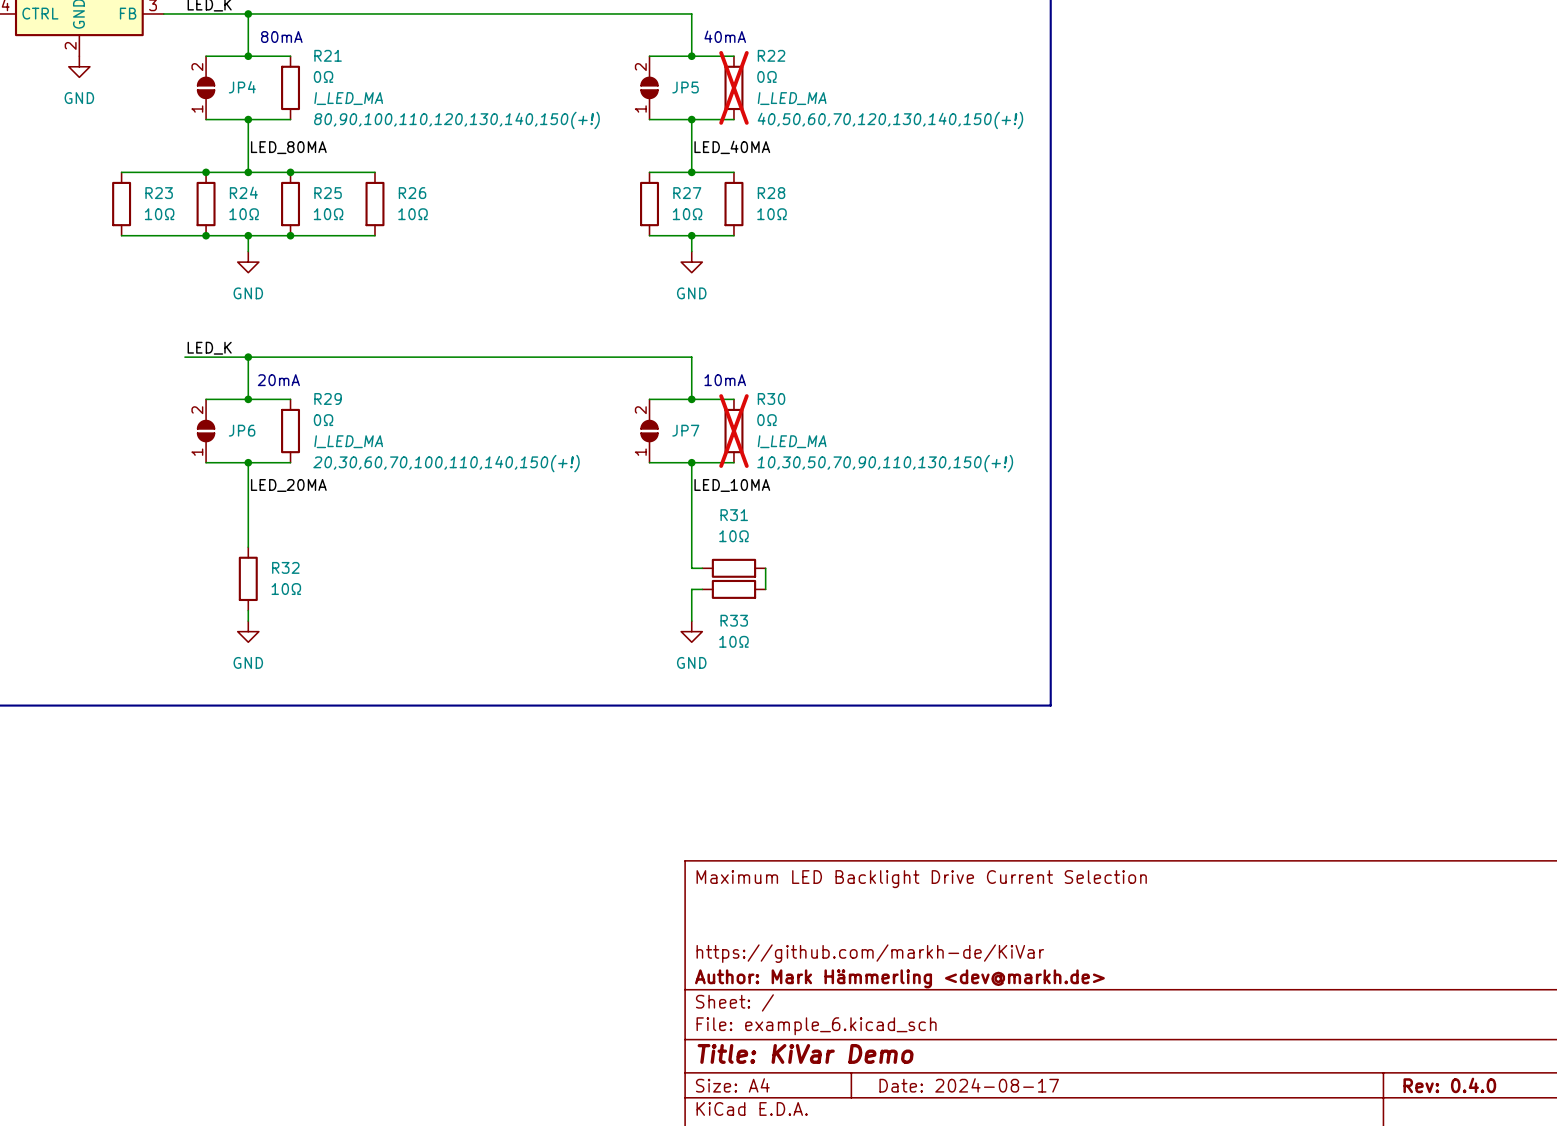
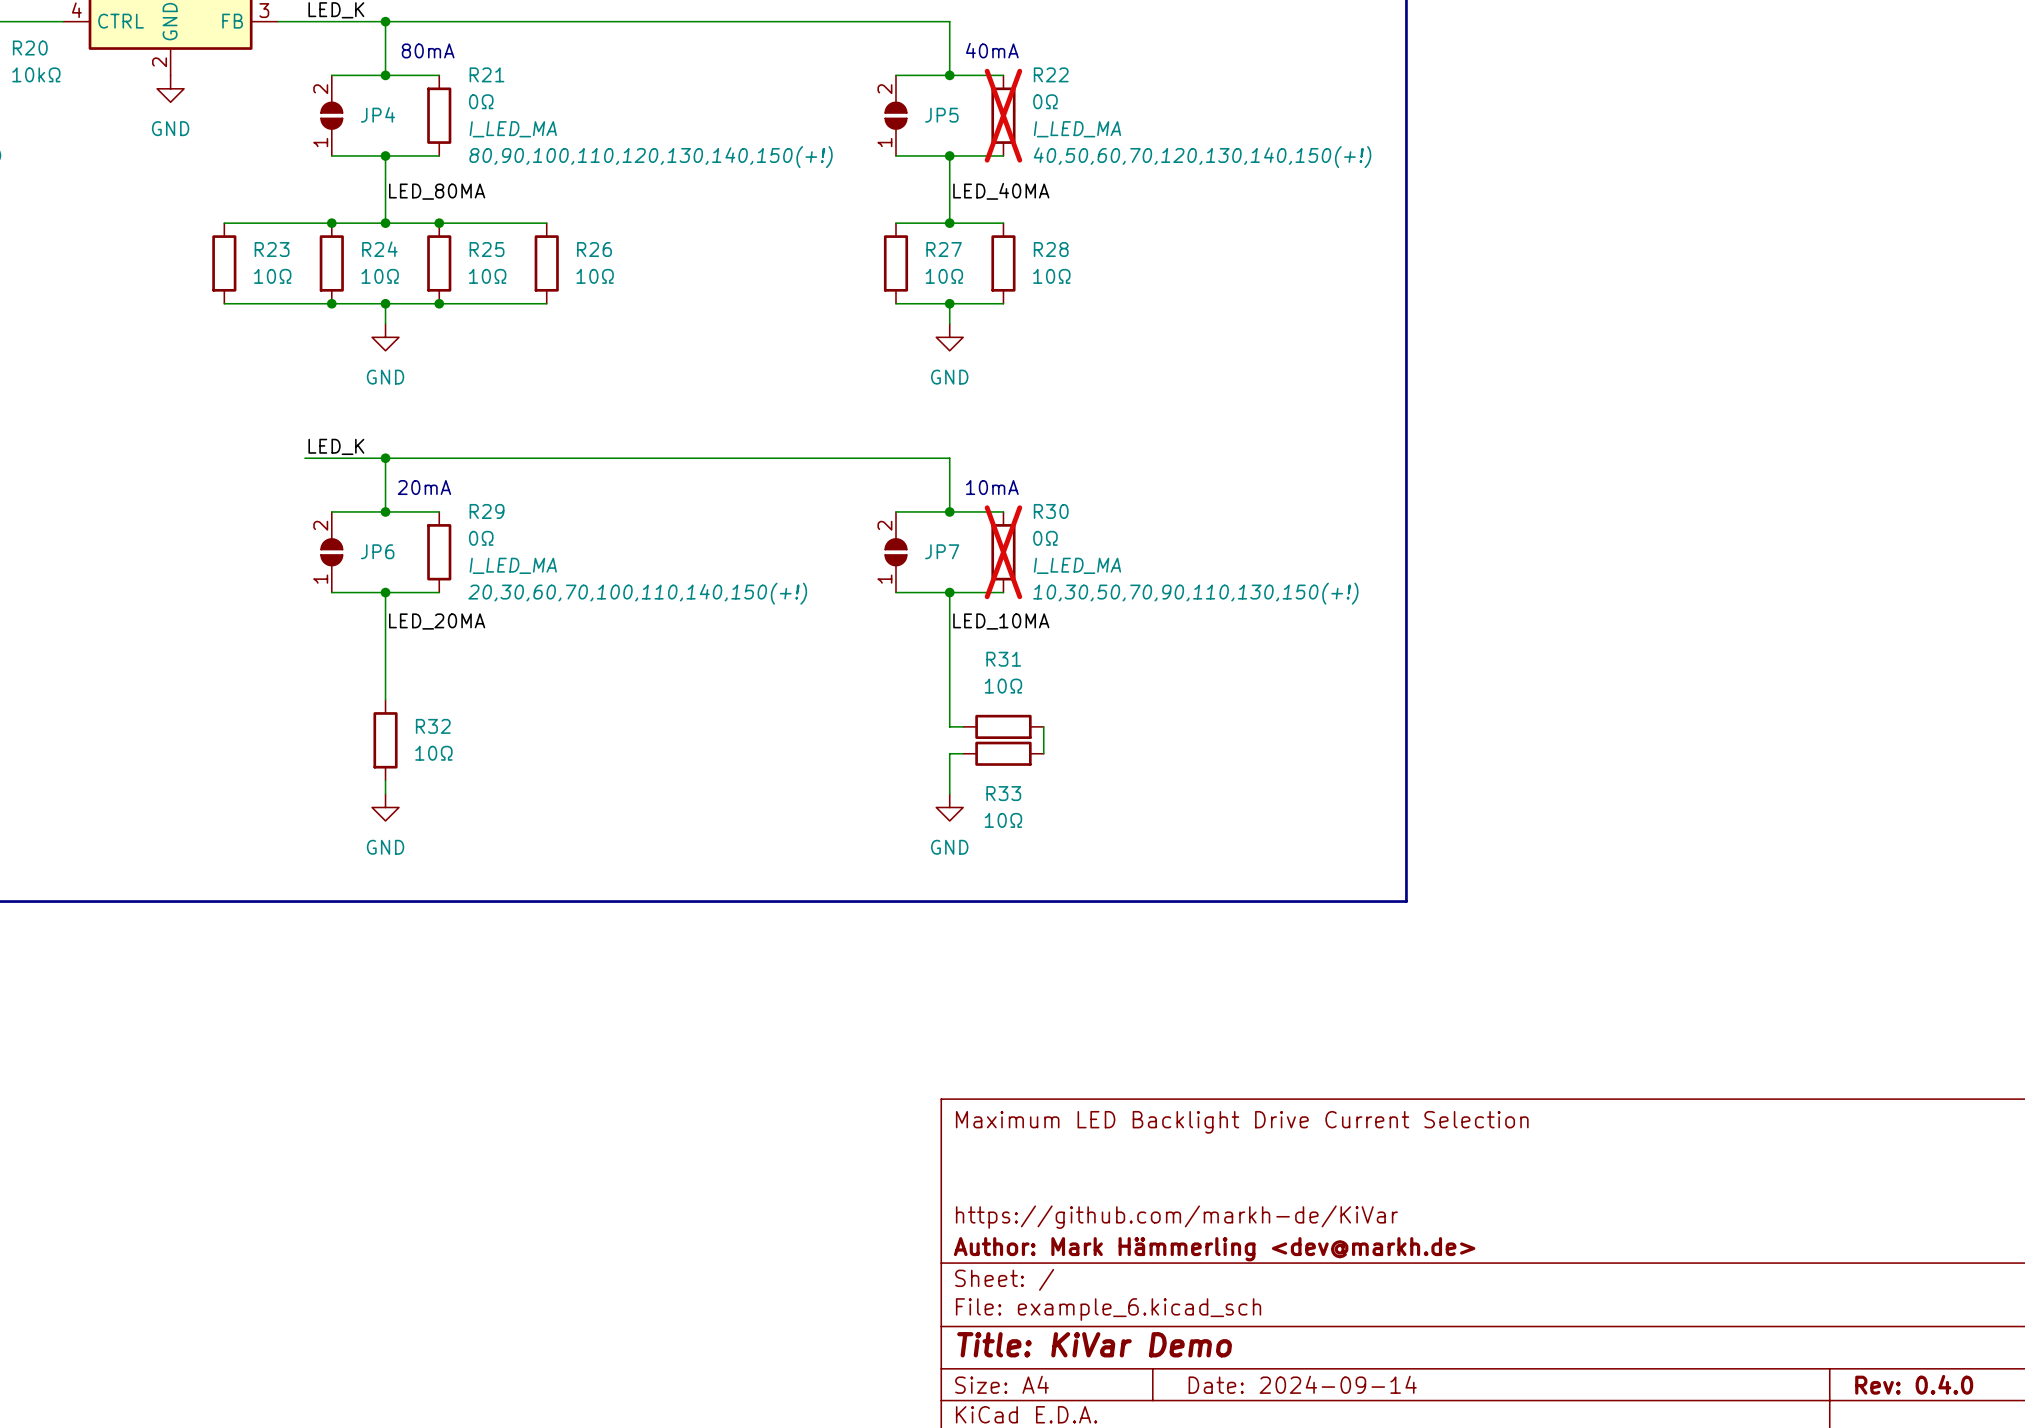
title block: Date: 2024-08-17 (969, 1085) -> Date: 2024-09-14 (1302, 1384)

